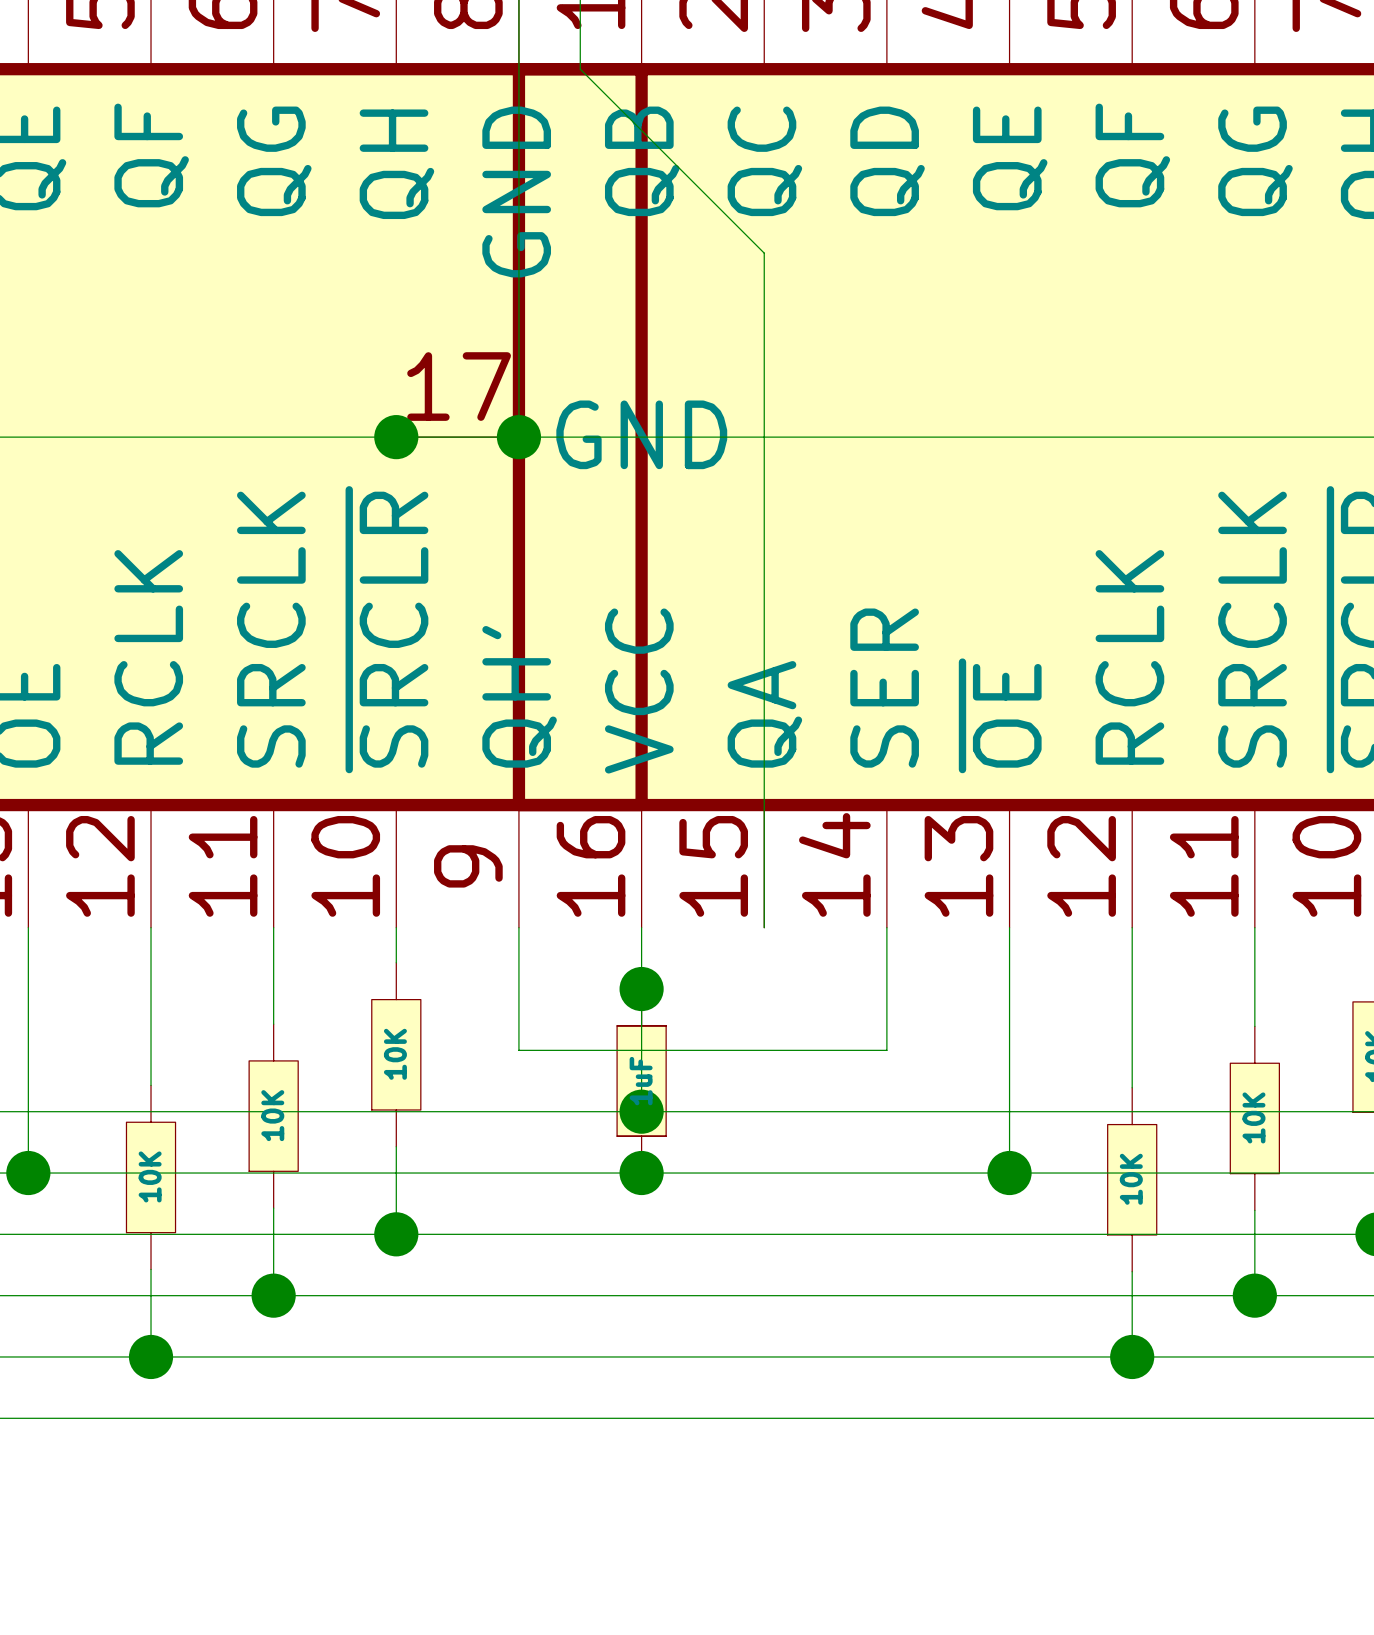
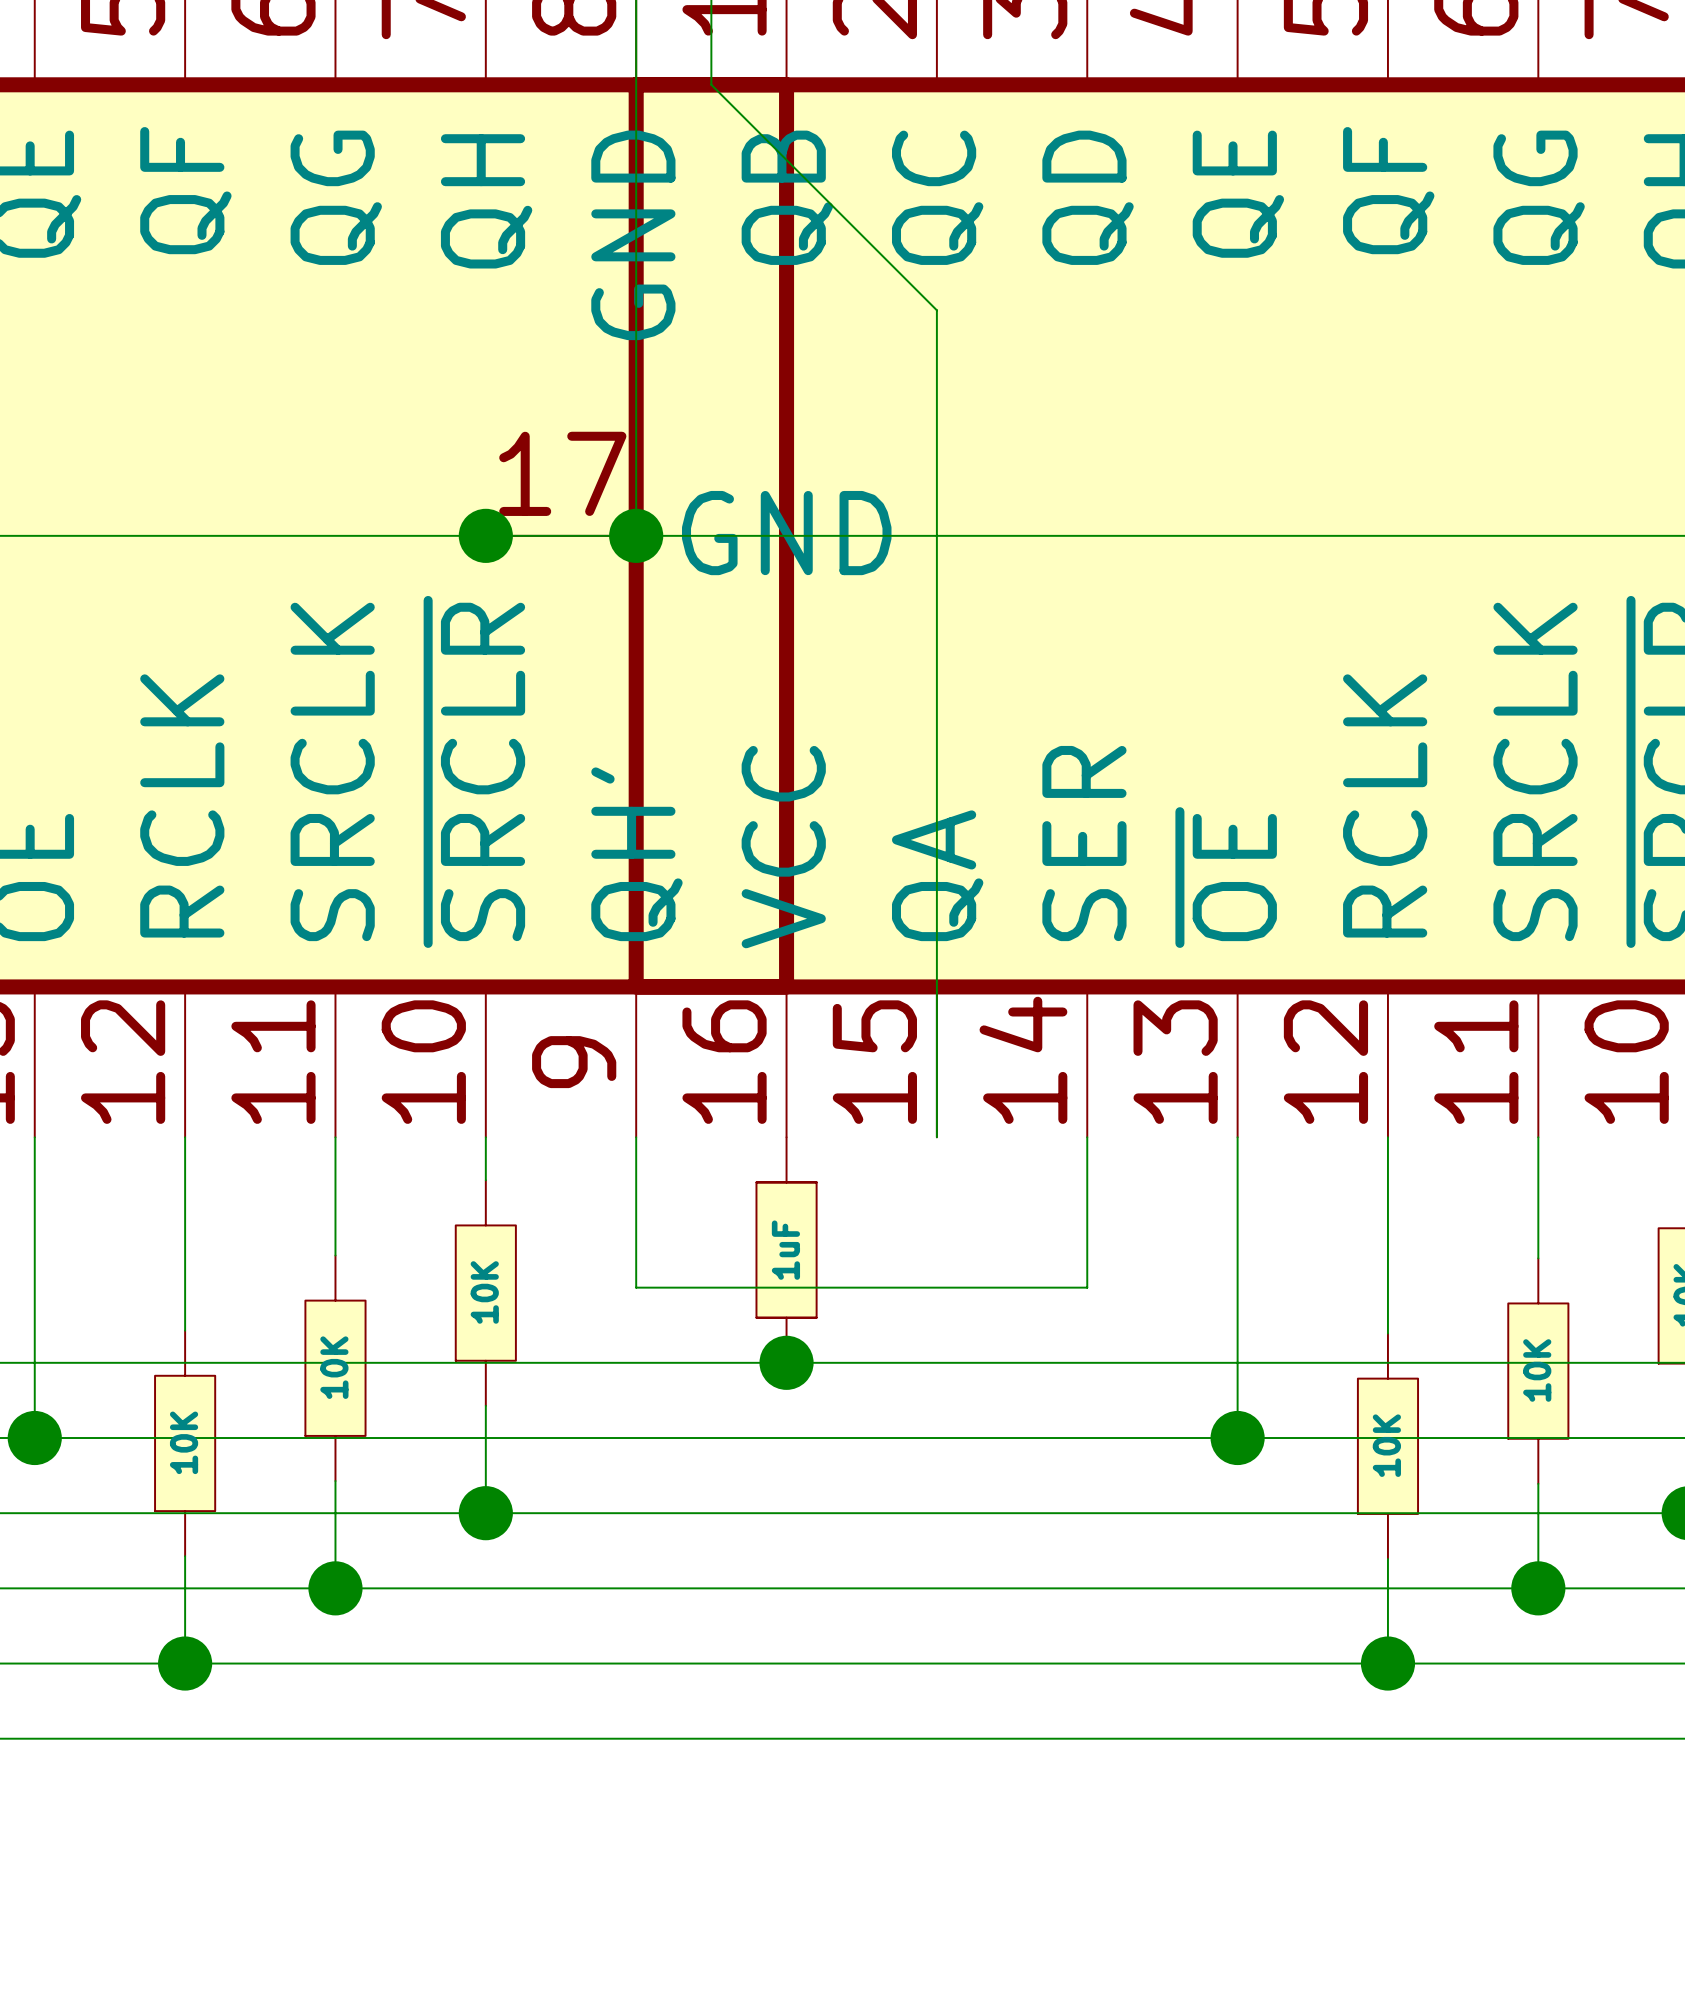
junction: (641, 989) -> none
part position: (641, 1081) -> (786, 1250)
junction: (641, 1173) -> none

